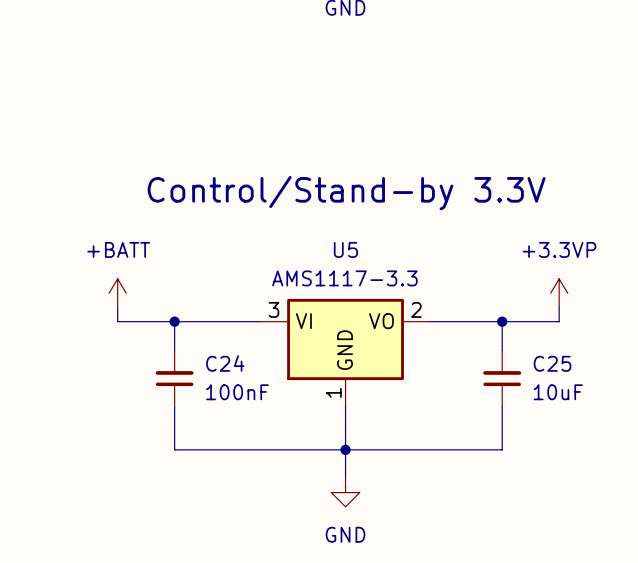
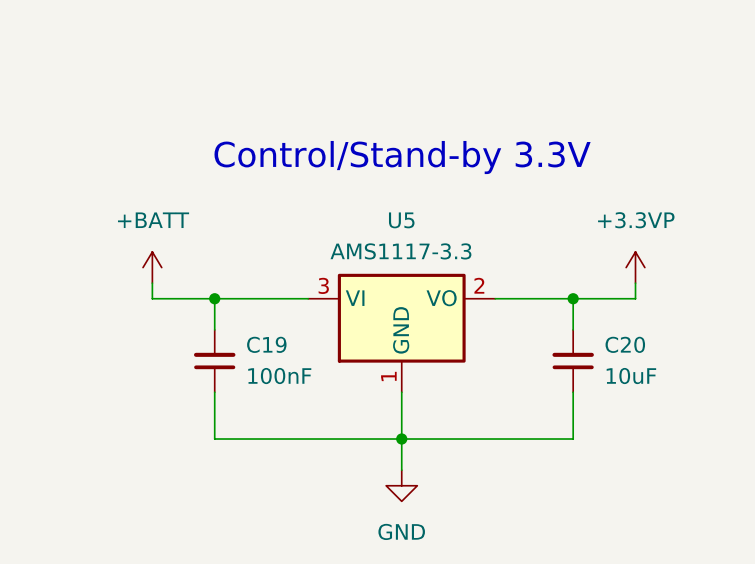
C24 name: C24 (225, 363) -> C19 (266, 344)
C25 name: C25 (552, 363) -> C20 (625, 344)

